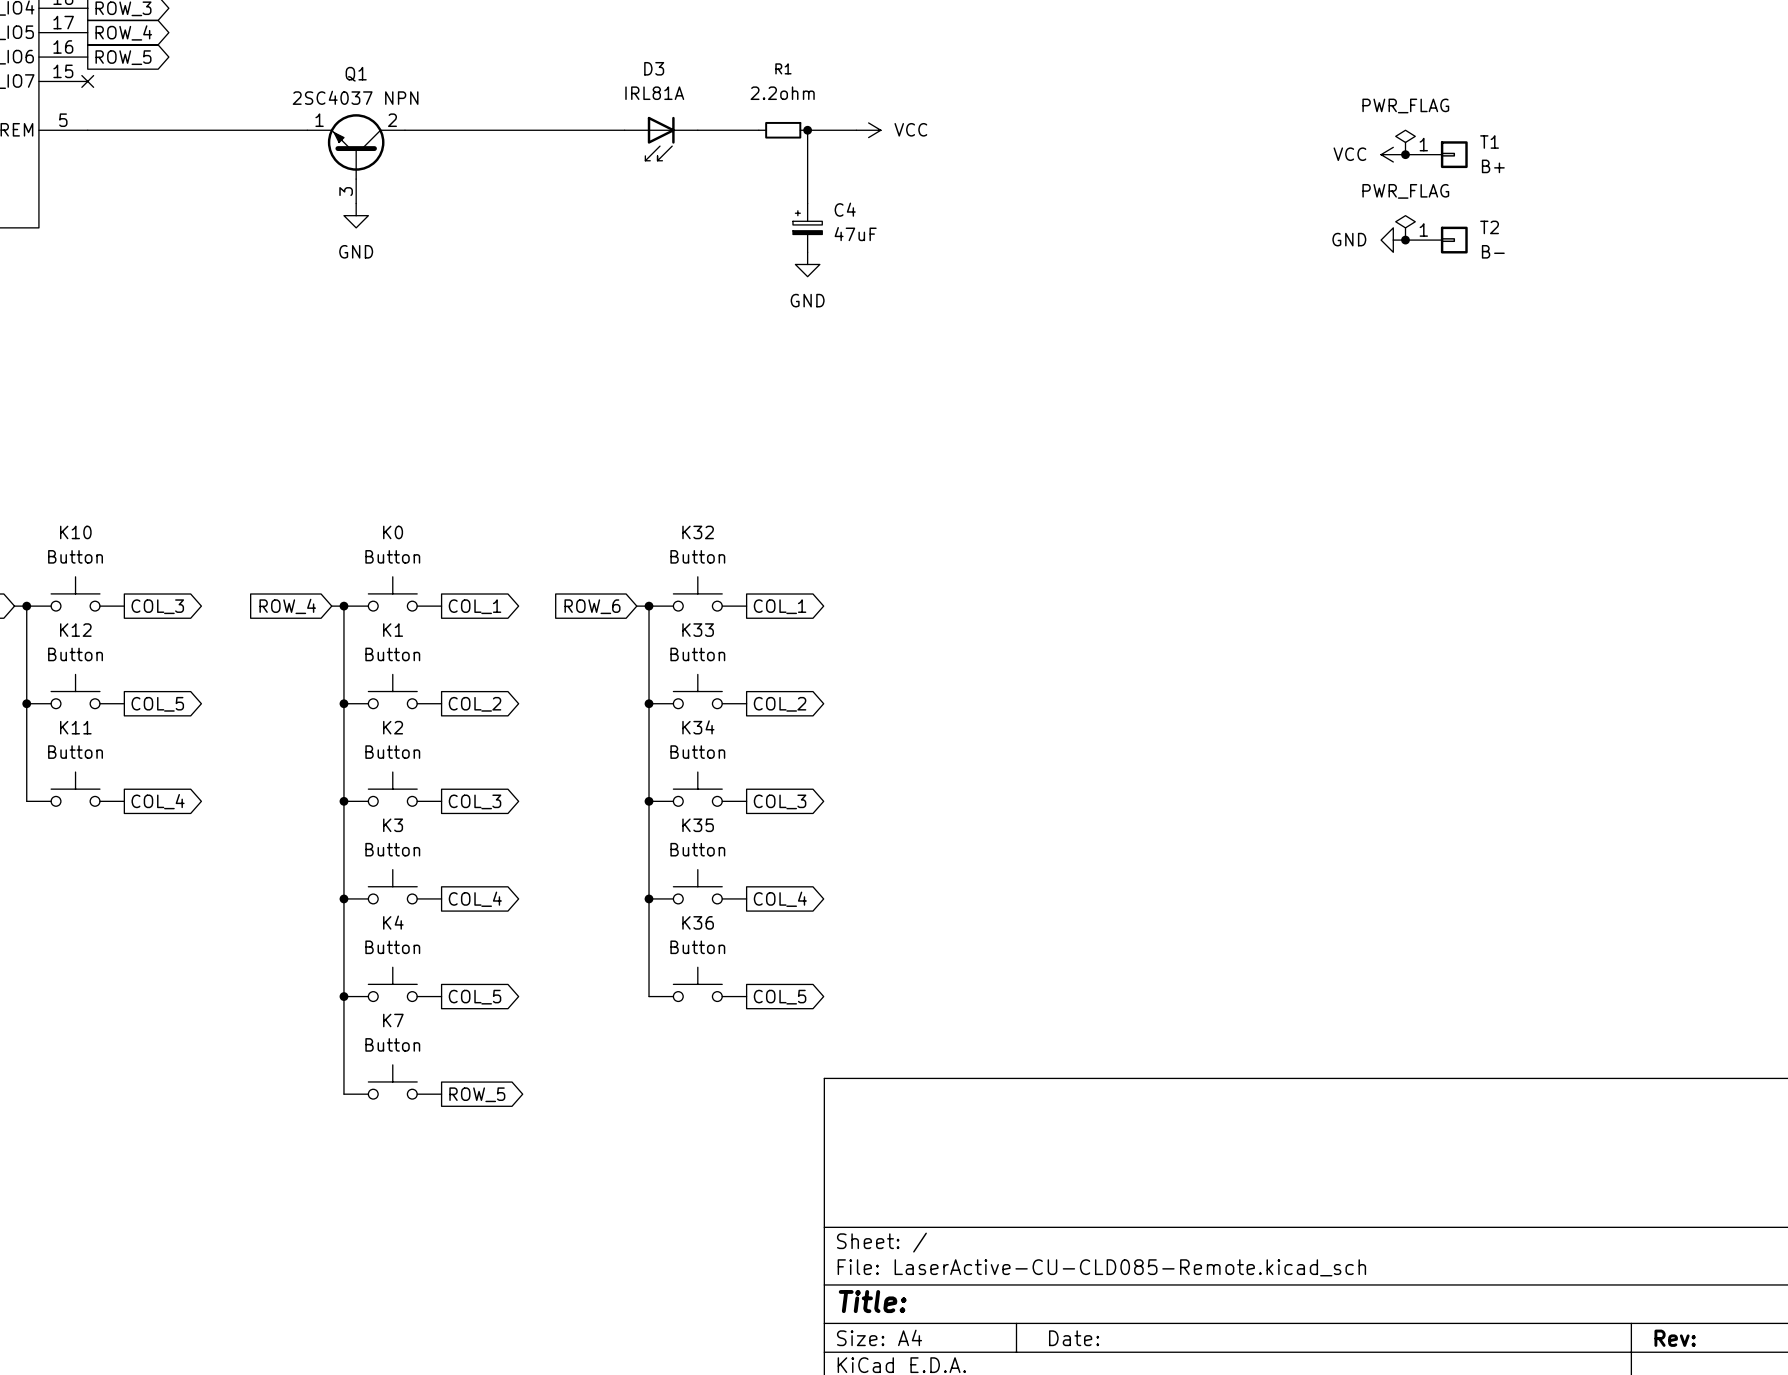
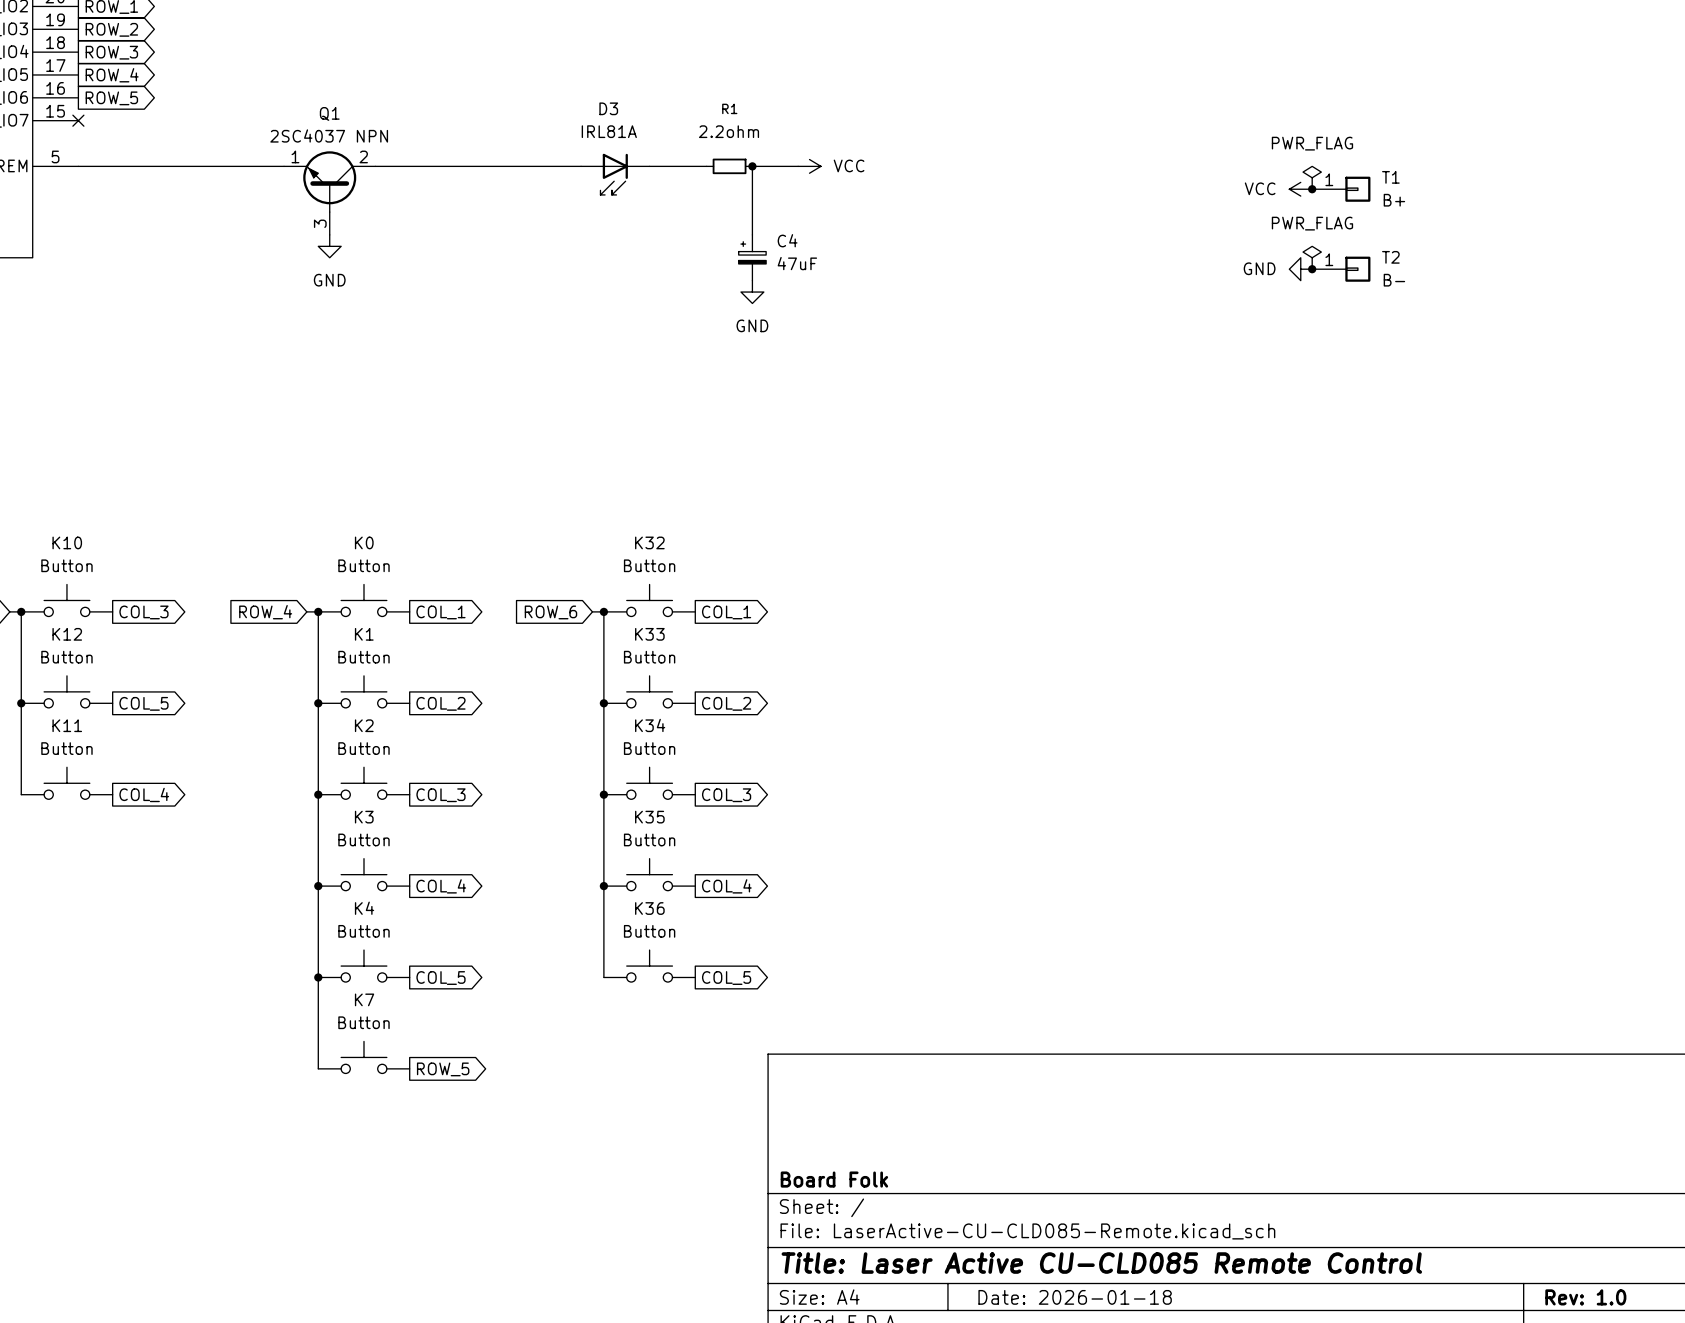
title block: none -> Board Folk (834, 1179)
title block: Title: (872, 1301) -> Title: Laser Active CU-CLD085 Remote Control (1101, 1263)
title block: Date: (1074, 1338) -> Date: 2026-01-18 (1075, 1297)
title block: Rev: (1675, 1338) -> Rev: 1.0 (1585, 1297)

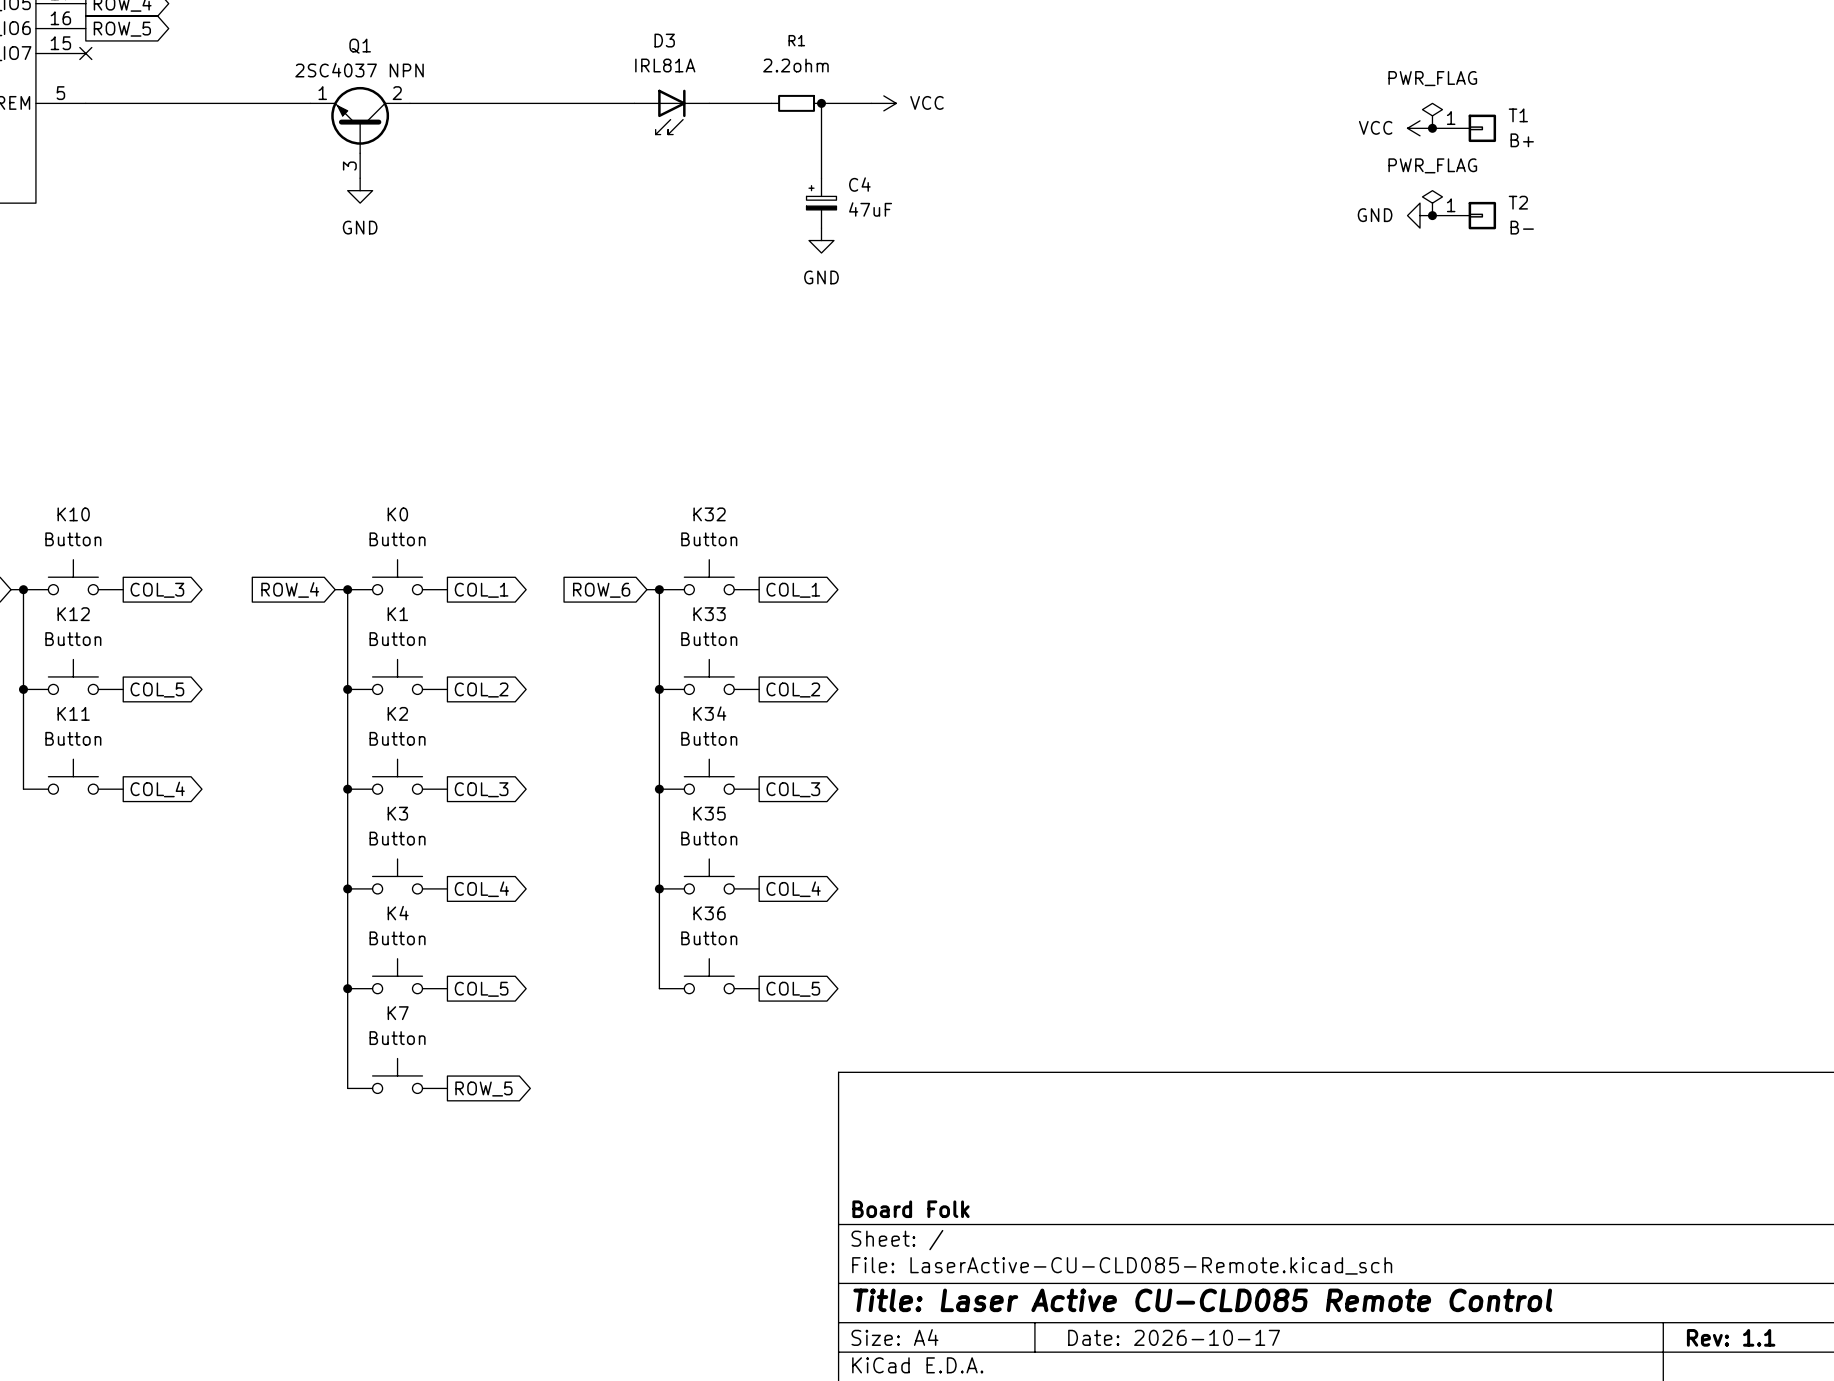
title block: Date: 2026-01-18 (1075, 1297) -> Date: 2026-10-17 (1174, 1337)
title block: Rev: 1.0 (1585, 1297) -> Rev: 1.1 (1731, 1337)

